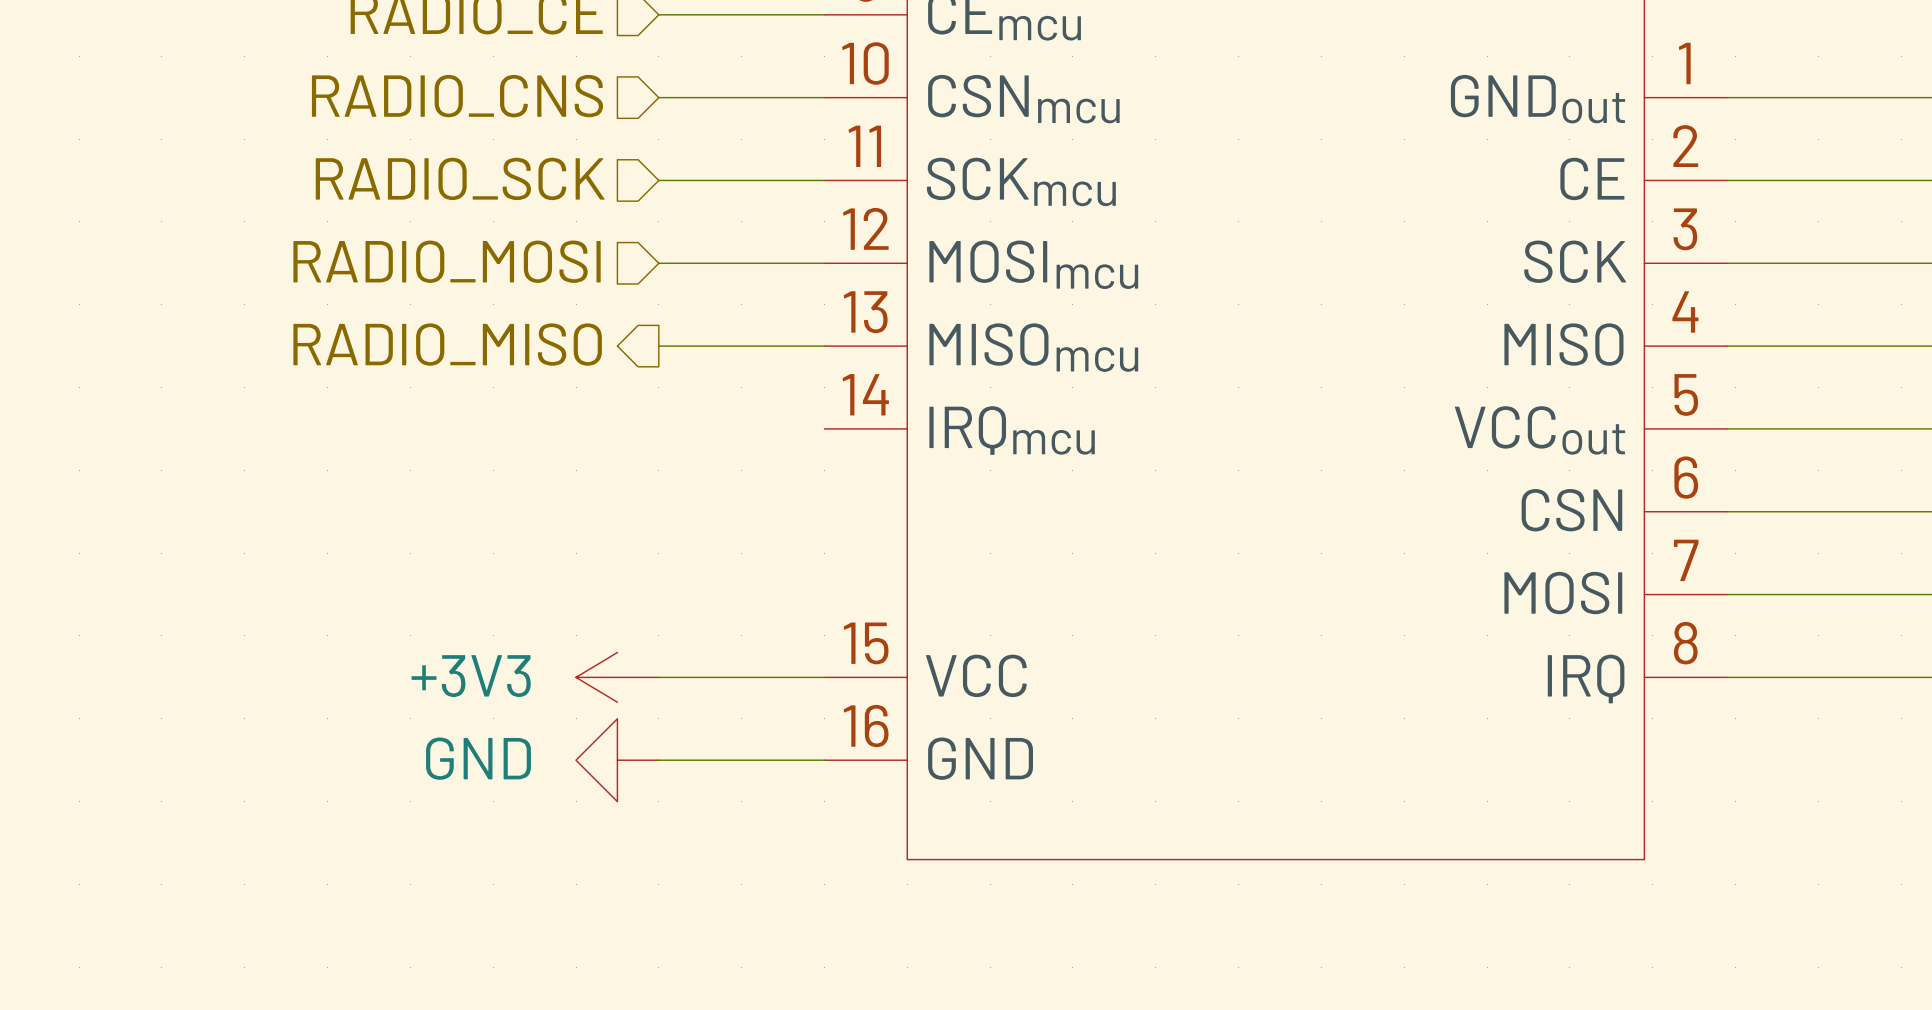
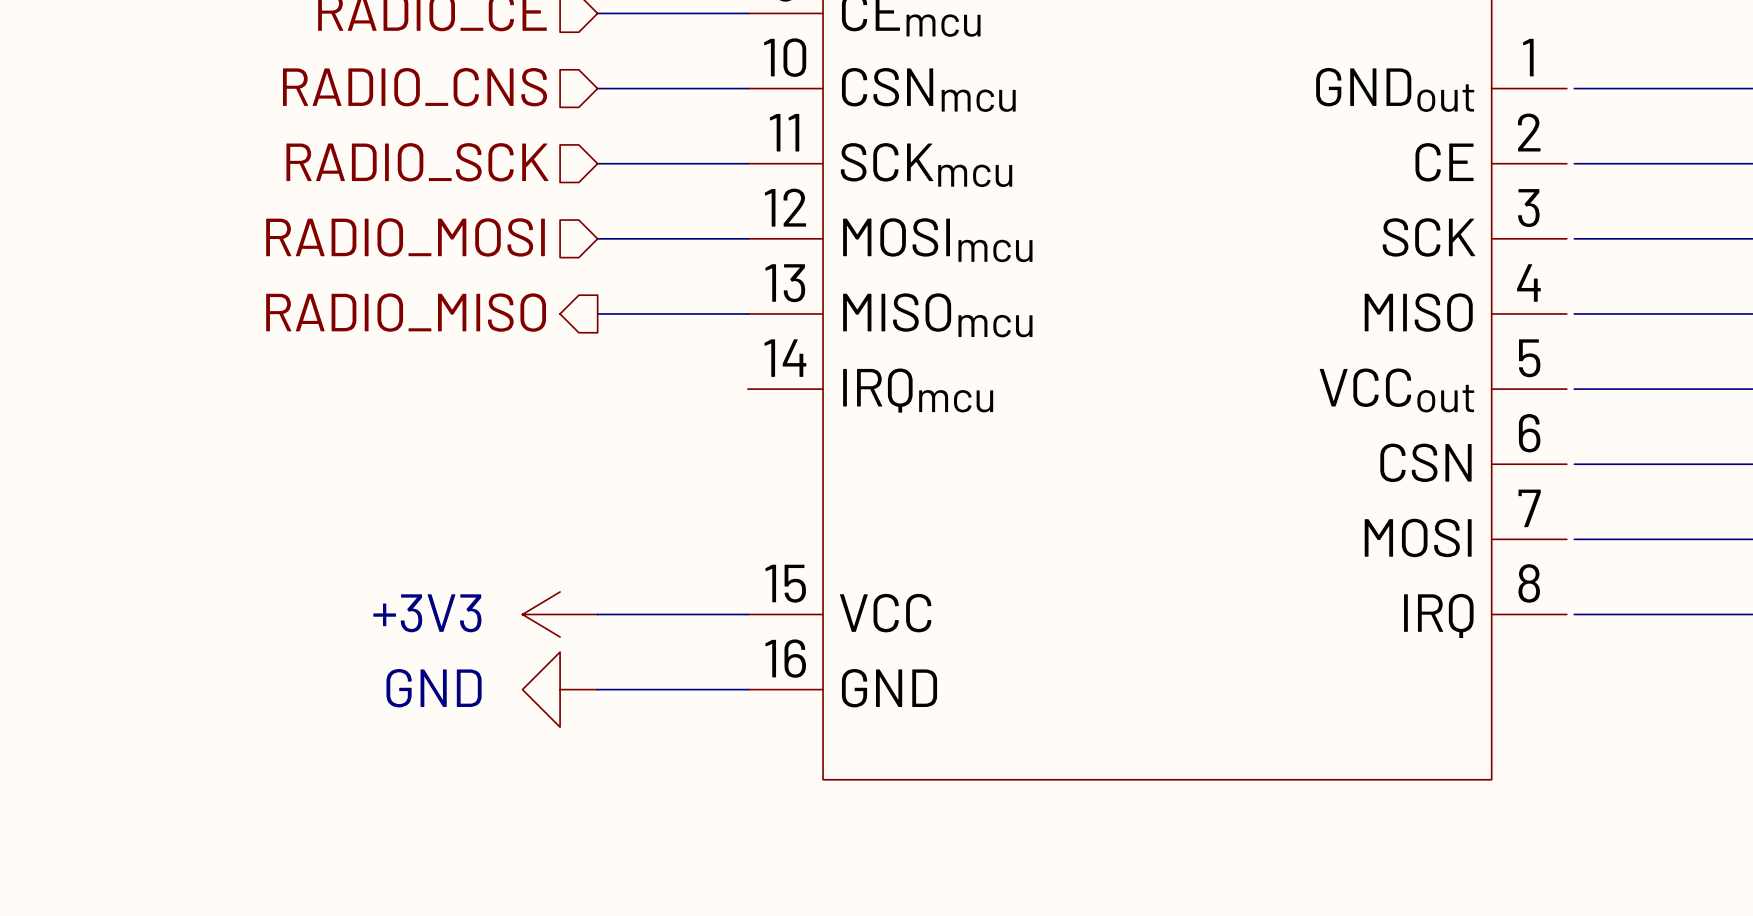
wire: (1727, 97) (1735, 97) -> none
wire: (1727, 180) (1735, 180) -> none
wire: (1727, 263) (1735, 263) -> none
wire: (1727, 346) (1735, 346) -> none
wire: (1727, 428) (1735, 428) -> none
wire: (1727, 511) (1735, 511) -> none
wire: (1727, 594) (1735, 594) -> none
wire: (1727, 677) (1735, 677) -> none

